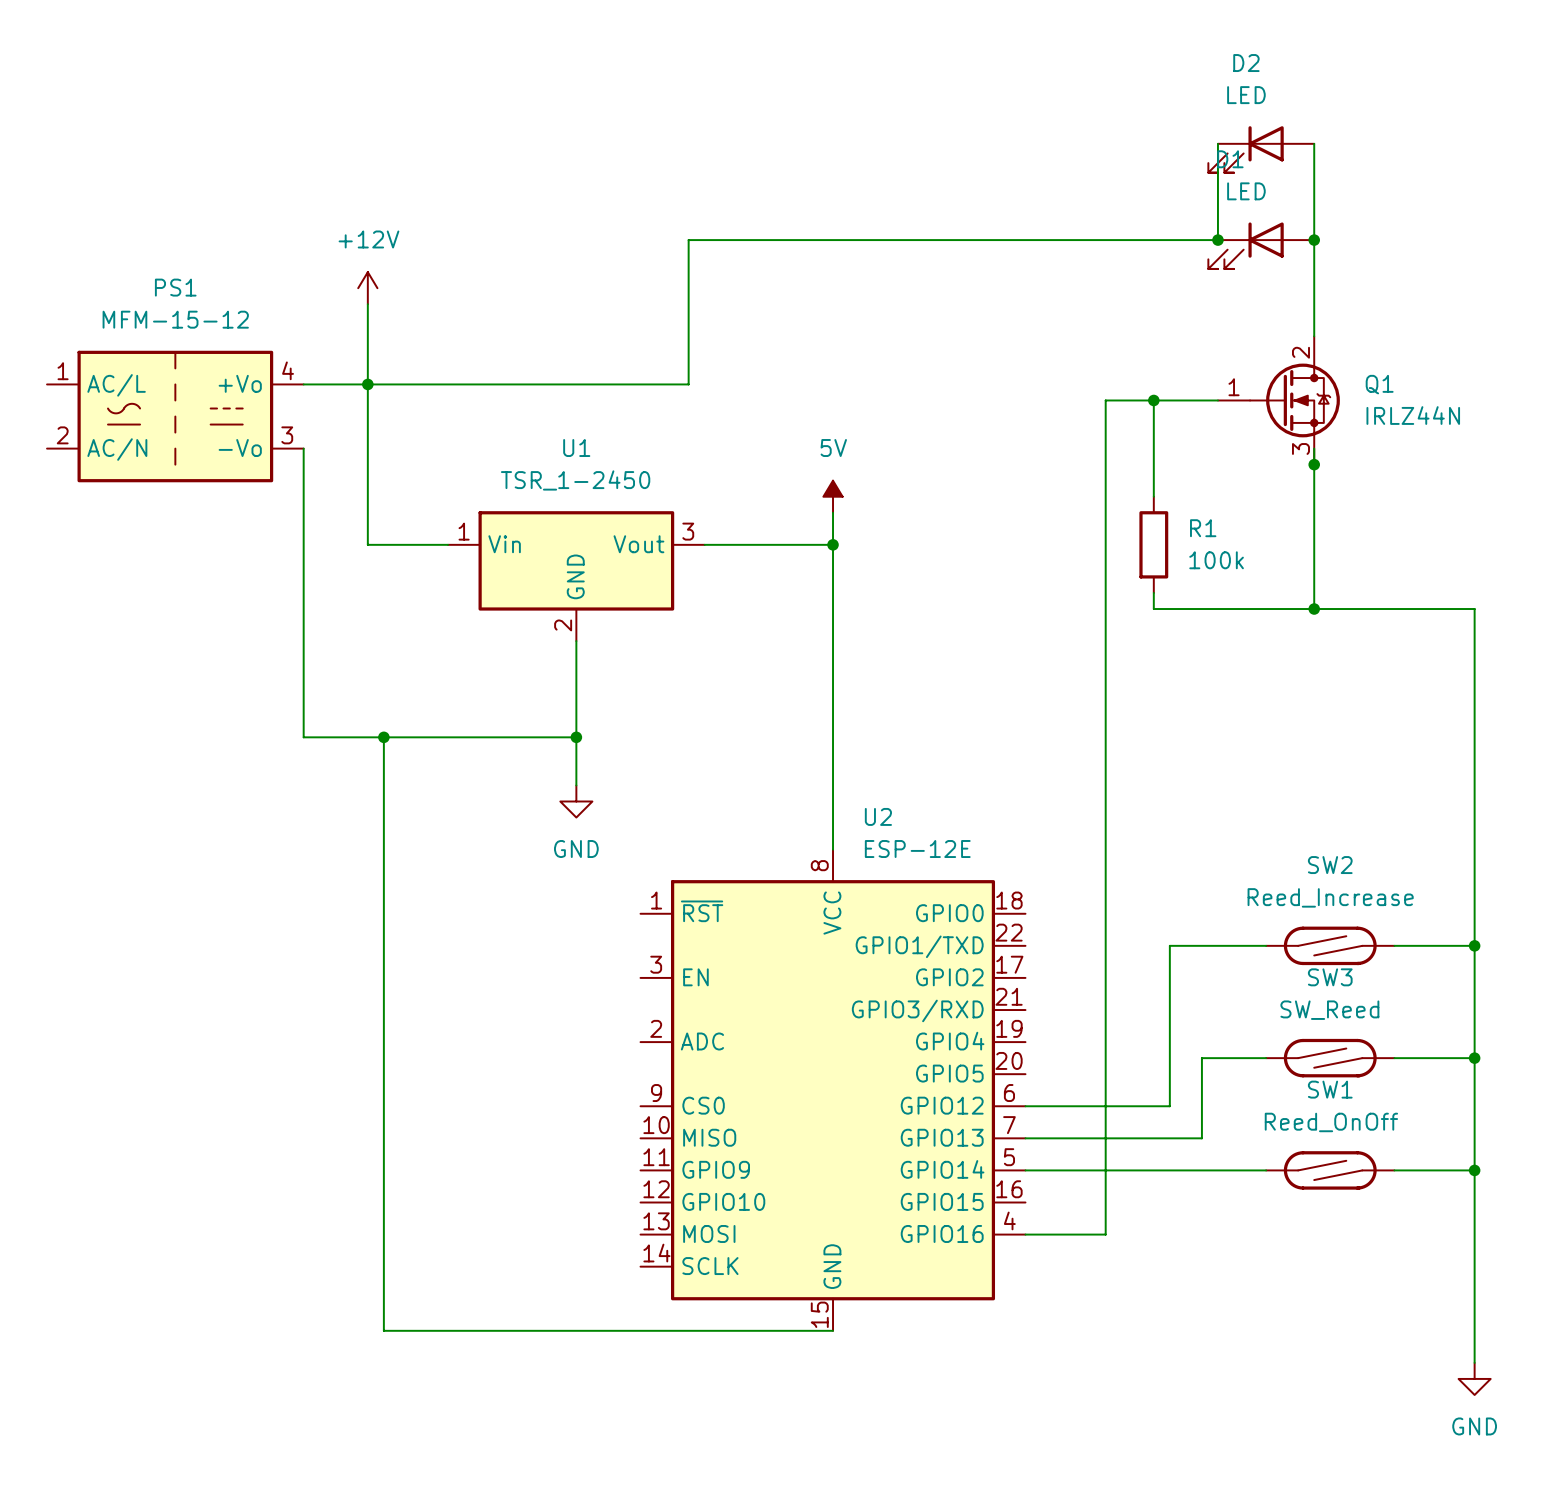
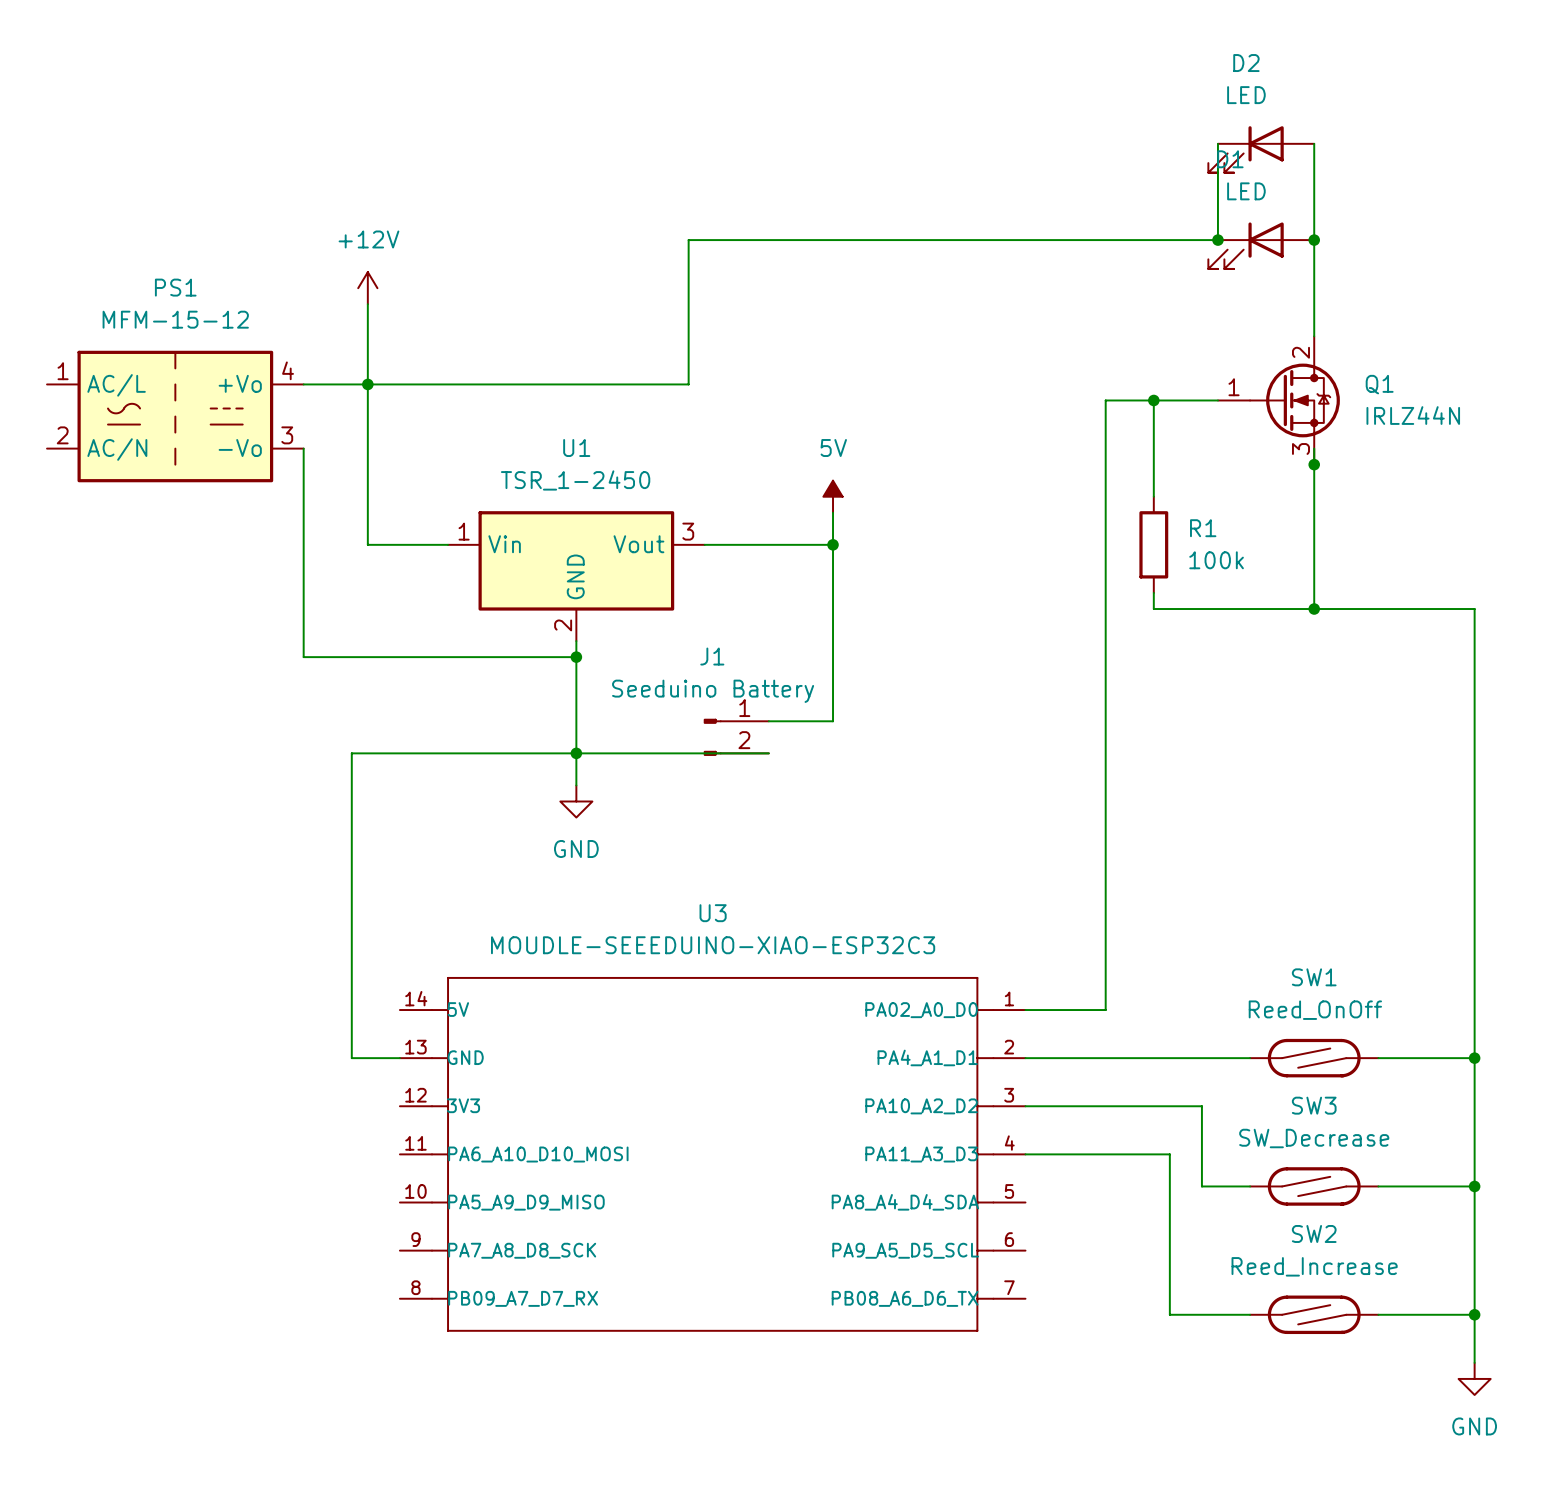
wire: (303, 657) (303, 737) (576, 737) -> (303, 657) (576, 657)
junction: none -> (576, 657)
wire: (833, 721) (833, 849) -> (833, 721) (768, 721)
wire: (383, 737) (383, 1330) (833, 1330) -> none
junction: (383, 737) -> none
junction position: (576, 737) -> (576, 753)
J1: none -> Seeduino Battery (736, 737)
wire: none -> (768, 753) (351, 753) (351, 1058) (399, 1058)
wire: (1266, 945) (1169, 945) (1169, 1106) -> none
SW2 position: (1330, 945) -> (1314, 1314)
wire: (1394, 945) (1474, 945) -> none
junction: (1474, 945) -> none
wire: (1105, 1010) (1105, 1234) (1025, 1234) -> (1105, 1010) (1025, 1010)
SW3 value: SW_Reed (1329, 1010) -> SW_Decrease (1314, 1138)
wire: none -> (1025, 1058) (1201, 1058)
wire: (1201, 1058) (1201, 1106) -> (1169, 1106) (1201, 1106)
SW3 position: (1330, 1058) -> (1314, 1186)
U2: ESP-12E (833, 1090) -> none
wire: (1025, 1138) (1201, 1138) -> (1250, 1186) (1201, 1186) (1201, 1138)
U3: none -> MOUDLE-SEEEDUINO-XIAO-ESP32C3 (712, 1154)
wire: none -> (1025, 1154) (1169, 1154) (1169, 1314) (1250, 1314)
wire: (1025, 1170) (1266, 1170) -> none
SW1 position: (1330, 1170) -> (1314, 1058)
wire: (1394, 1170) (1474, 1170) -> none
junction position: (1474, 1170) -> (1474, 1186)
wire: none -> (1378, 1186) (1474, 1186)
wire: none -> (1378, 1314) (1474, 1314)
junction: none -> (1474, 1314)

